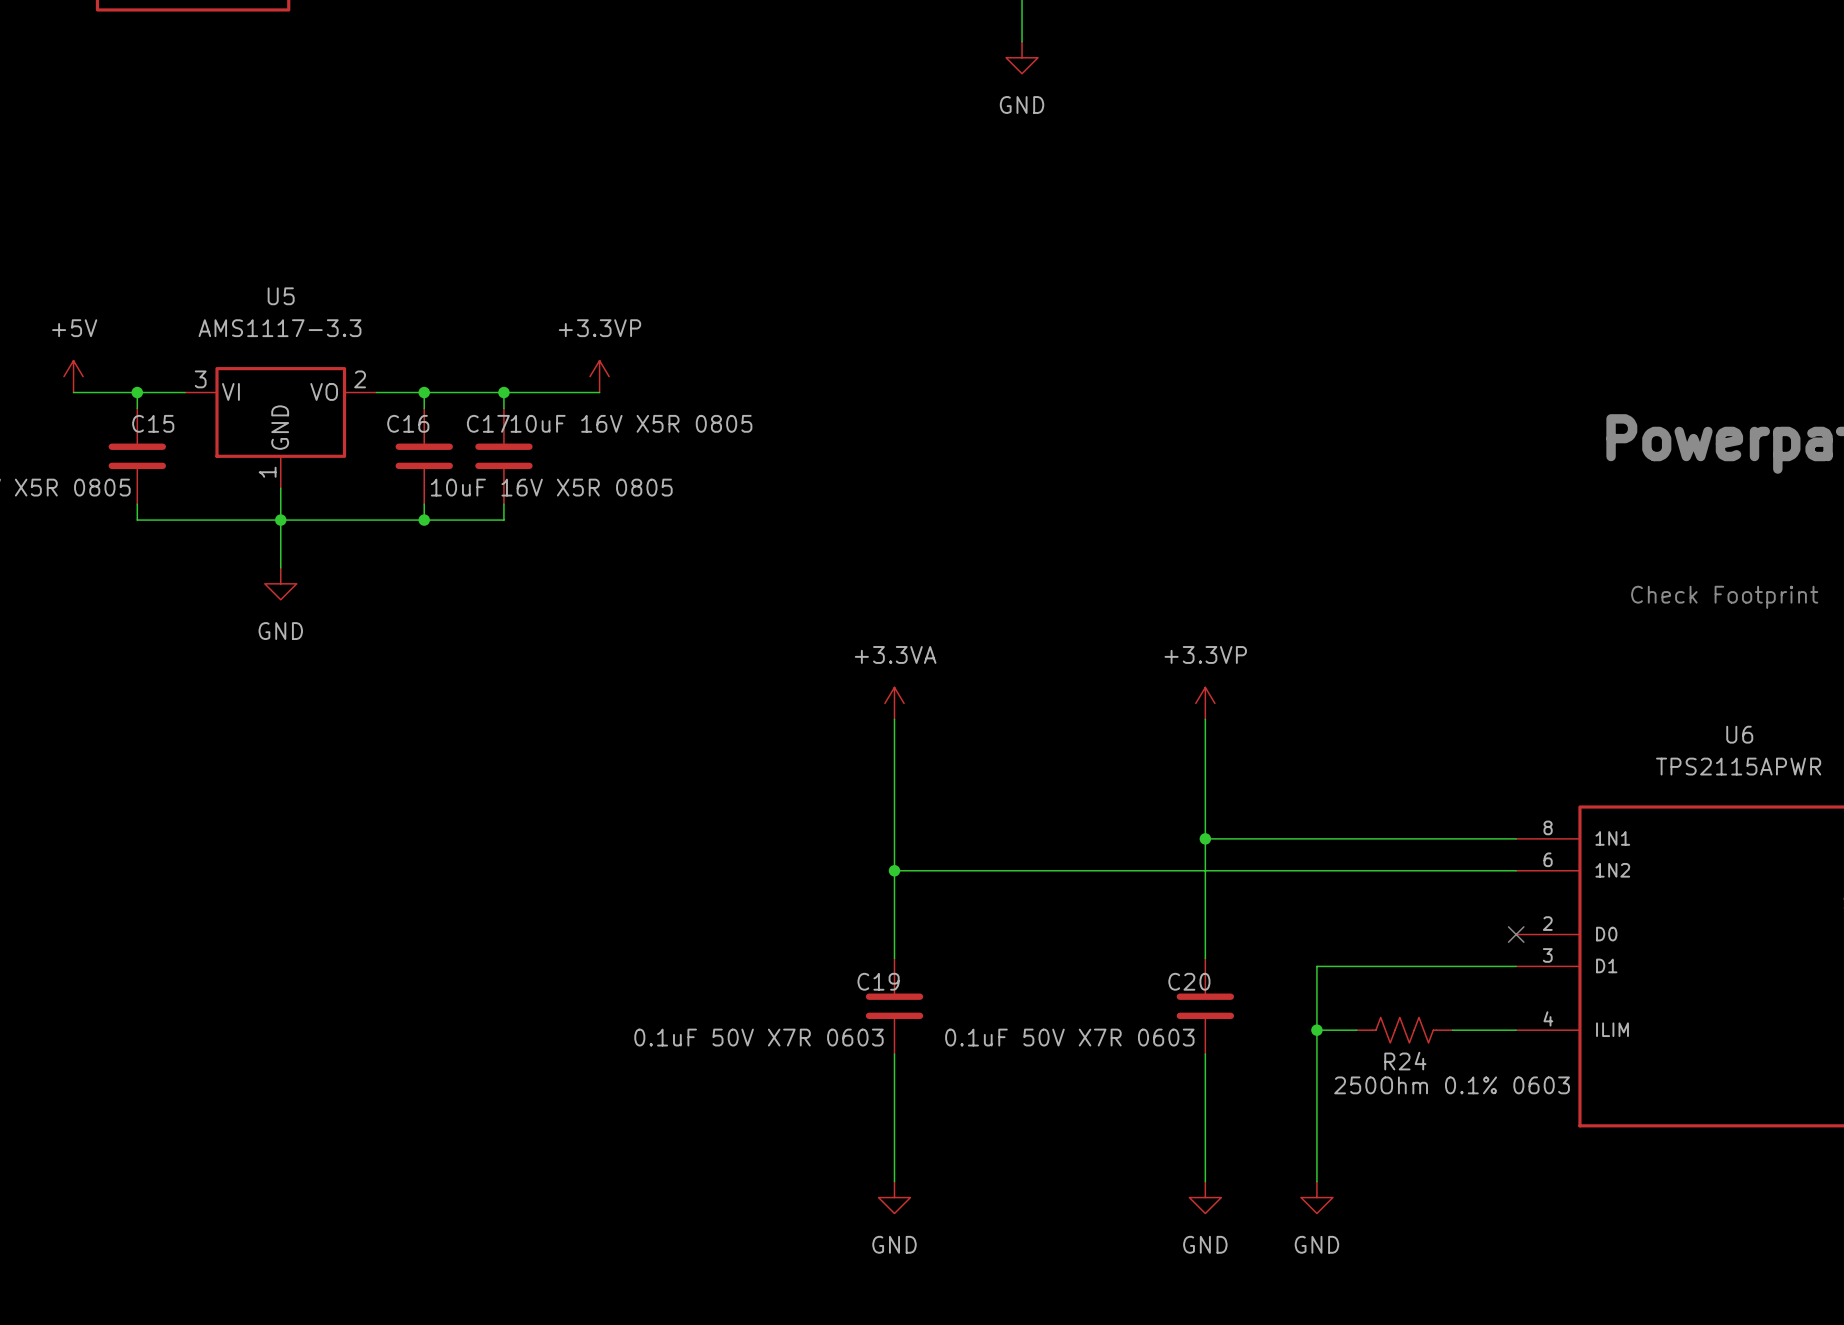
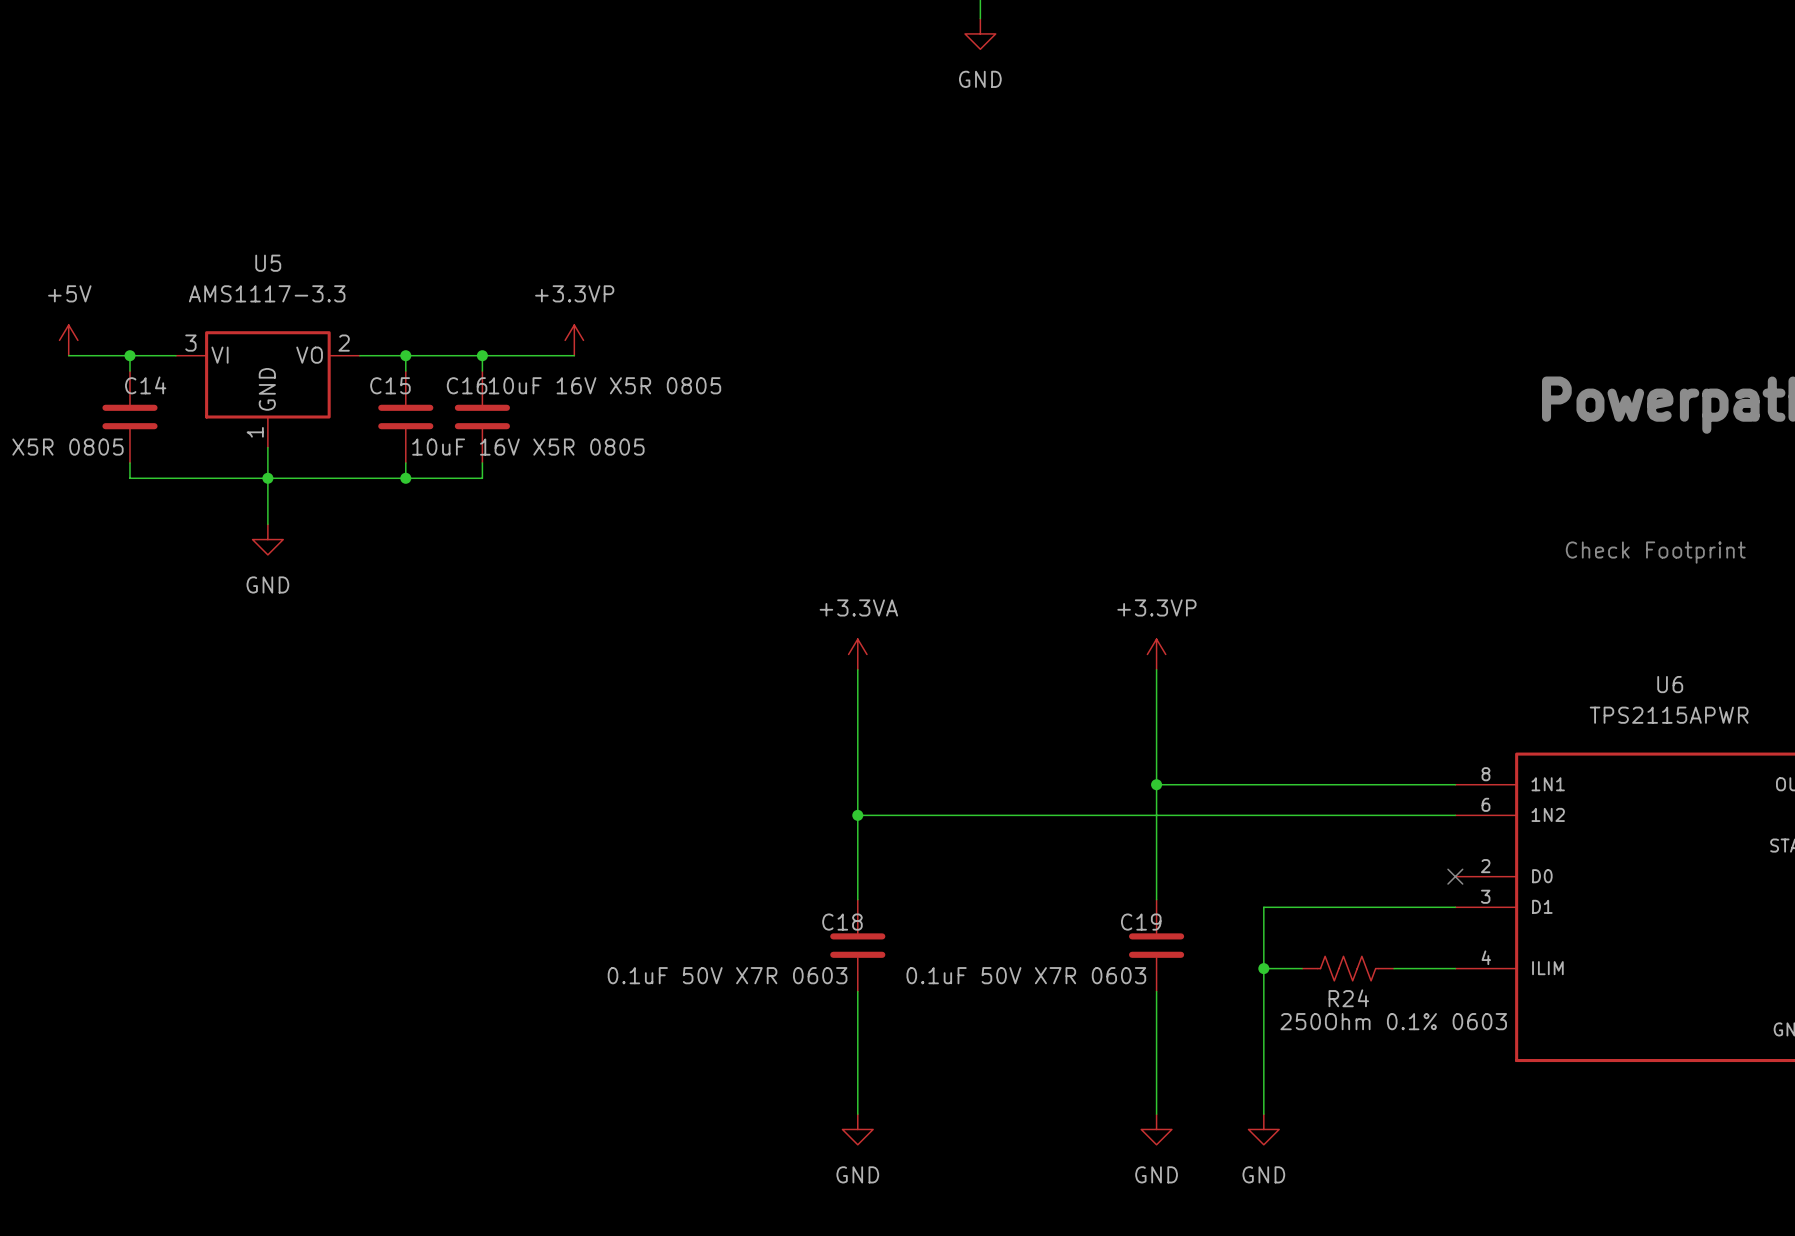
C15 name: C15 (153, 423) -> C14 (145, 385)
C16 name: C16 (408, 423) -> C15 (390, 385)
C17 name: C17 (488, 423) -> C16 (467, 385)
C19 name: C19 (878, 981) -> C18 (842, 922)
C20 name: C20 (1189, 981) -> C19 (1141, 922)

